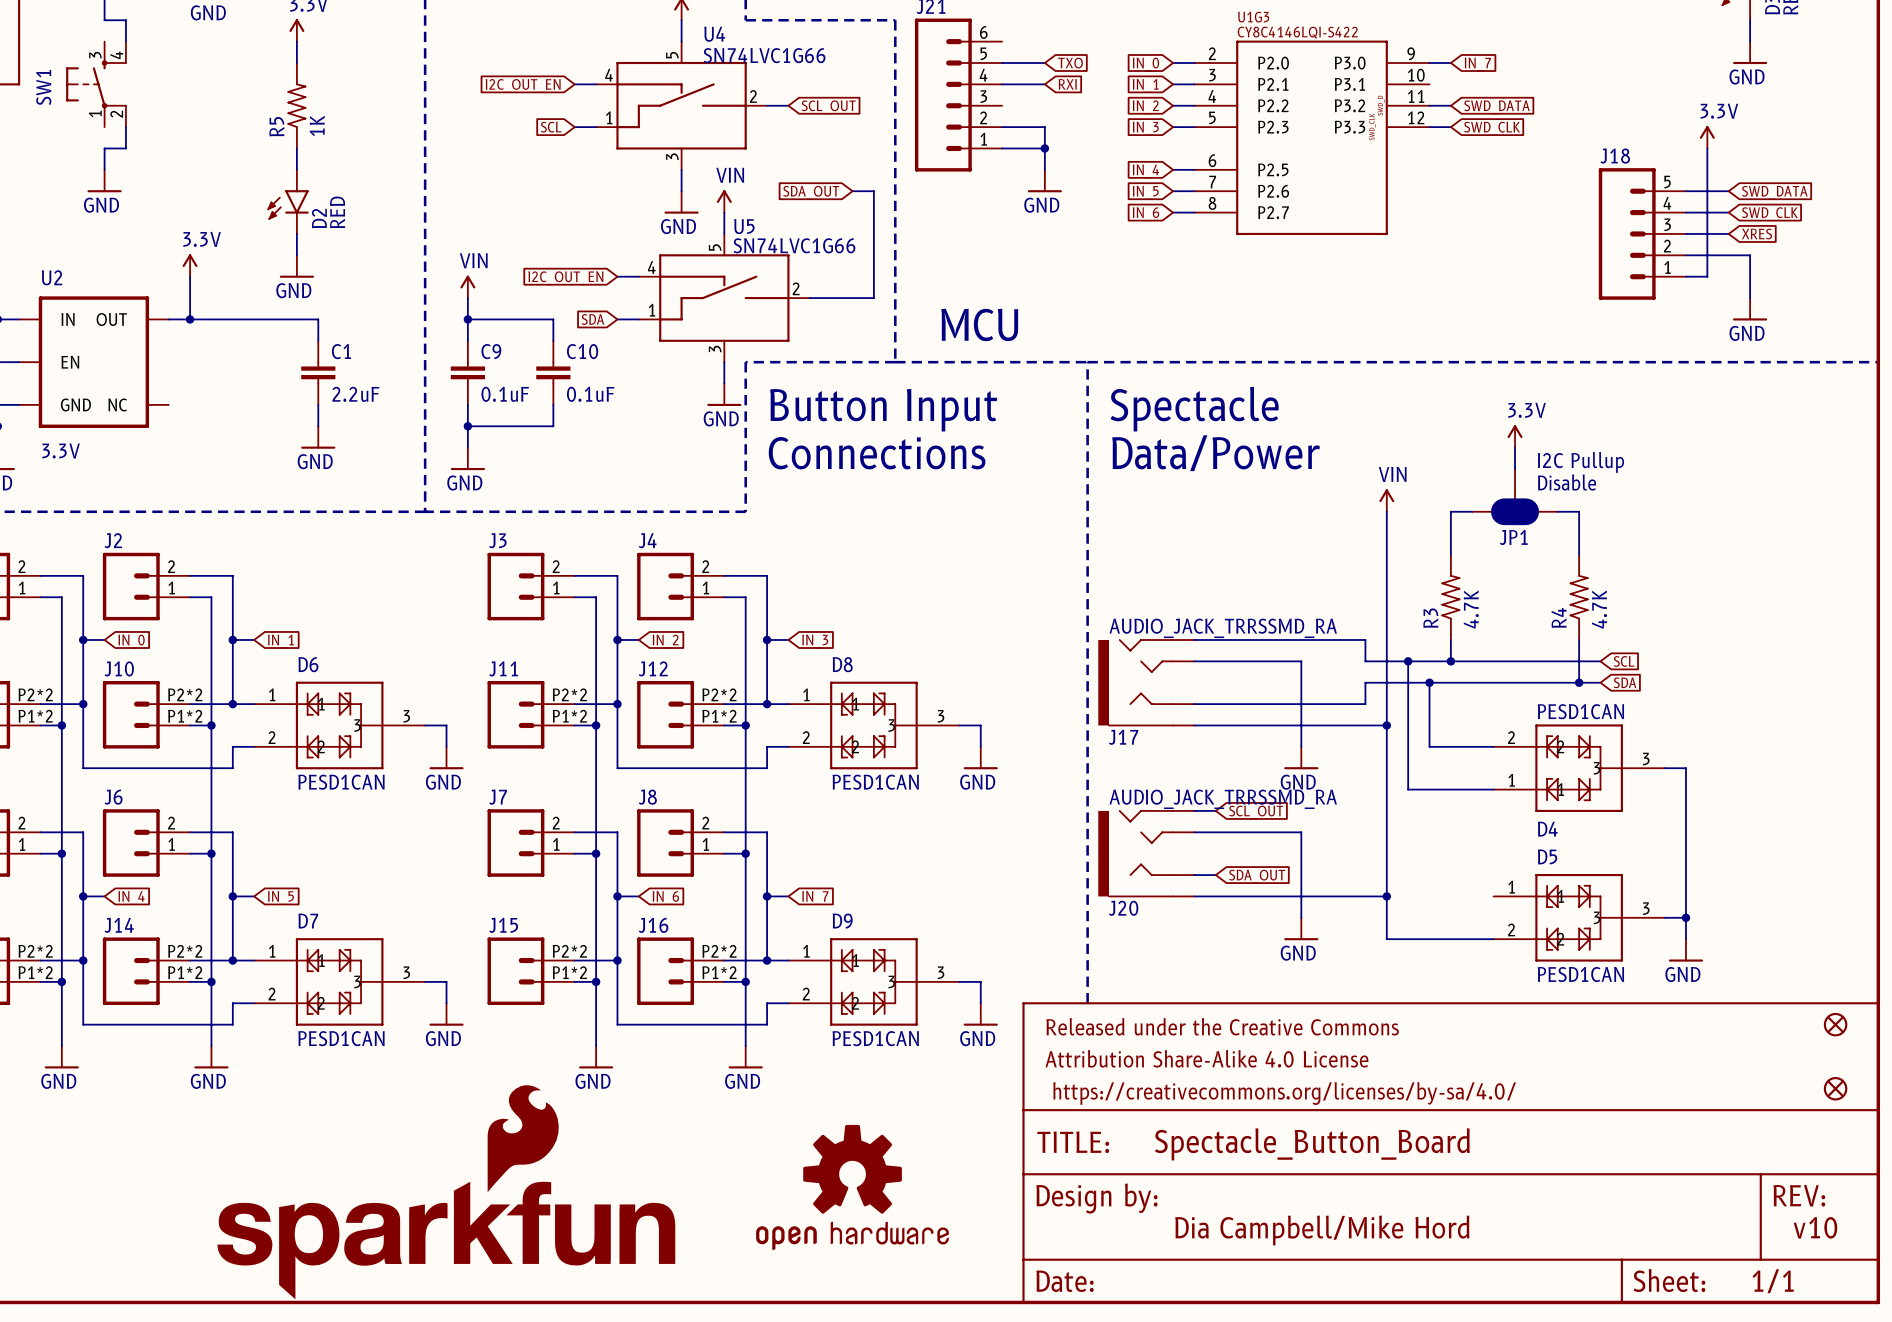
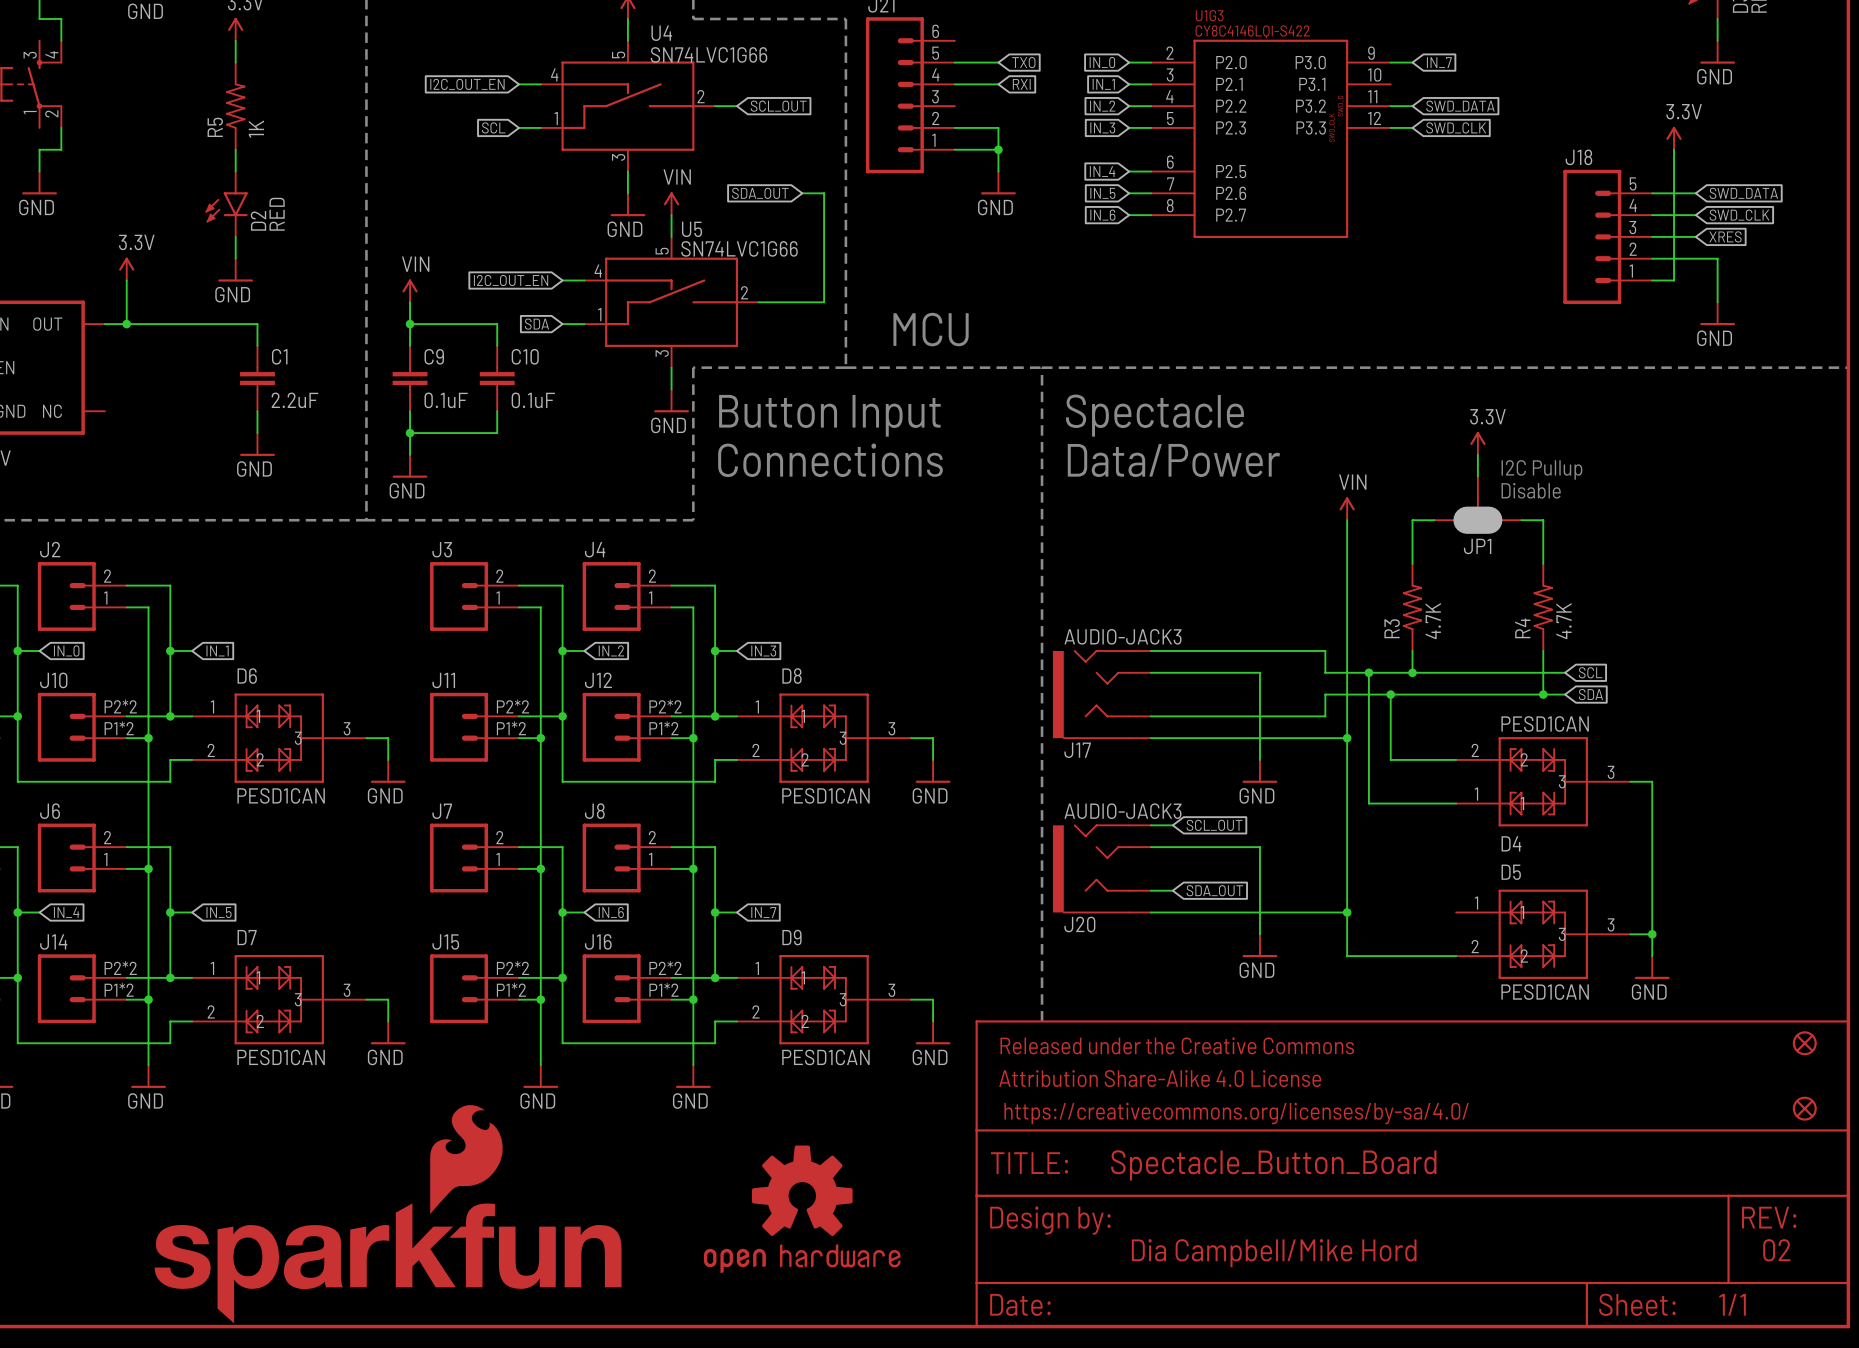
J17 value: AUDIO_JACK_TRRSSMD_RA (1223, 628) -> AUDIO-JACK3 (1122, 636)
J20 value: AUDIO_JACK_TRRSSMD_RA (1223, 799) -> AUDIO-JACK3 (1122, 811)
text: v10 (1815, 1227) -> 02 (1776, 1250)

